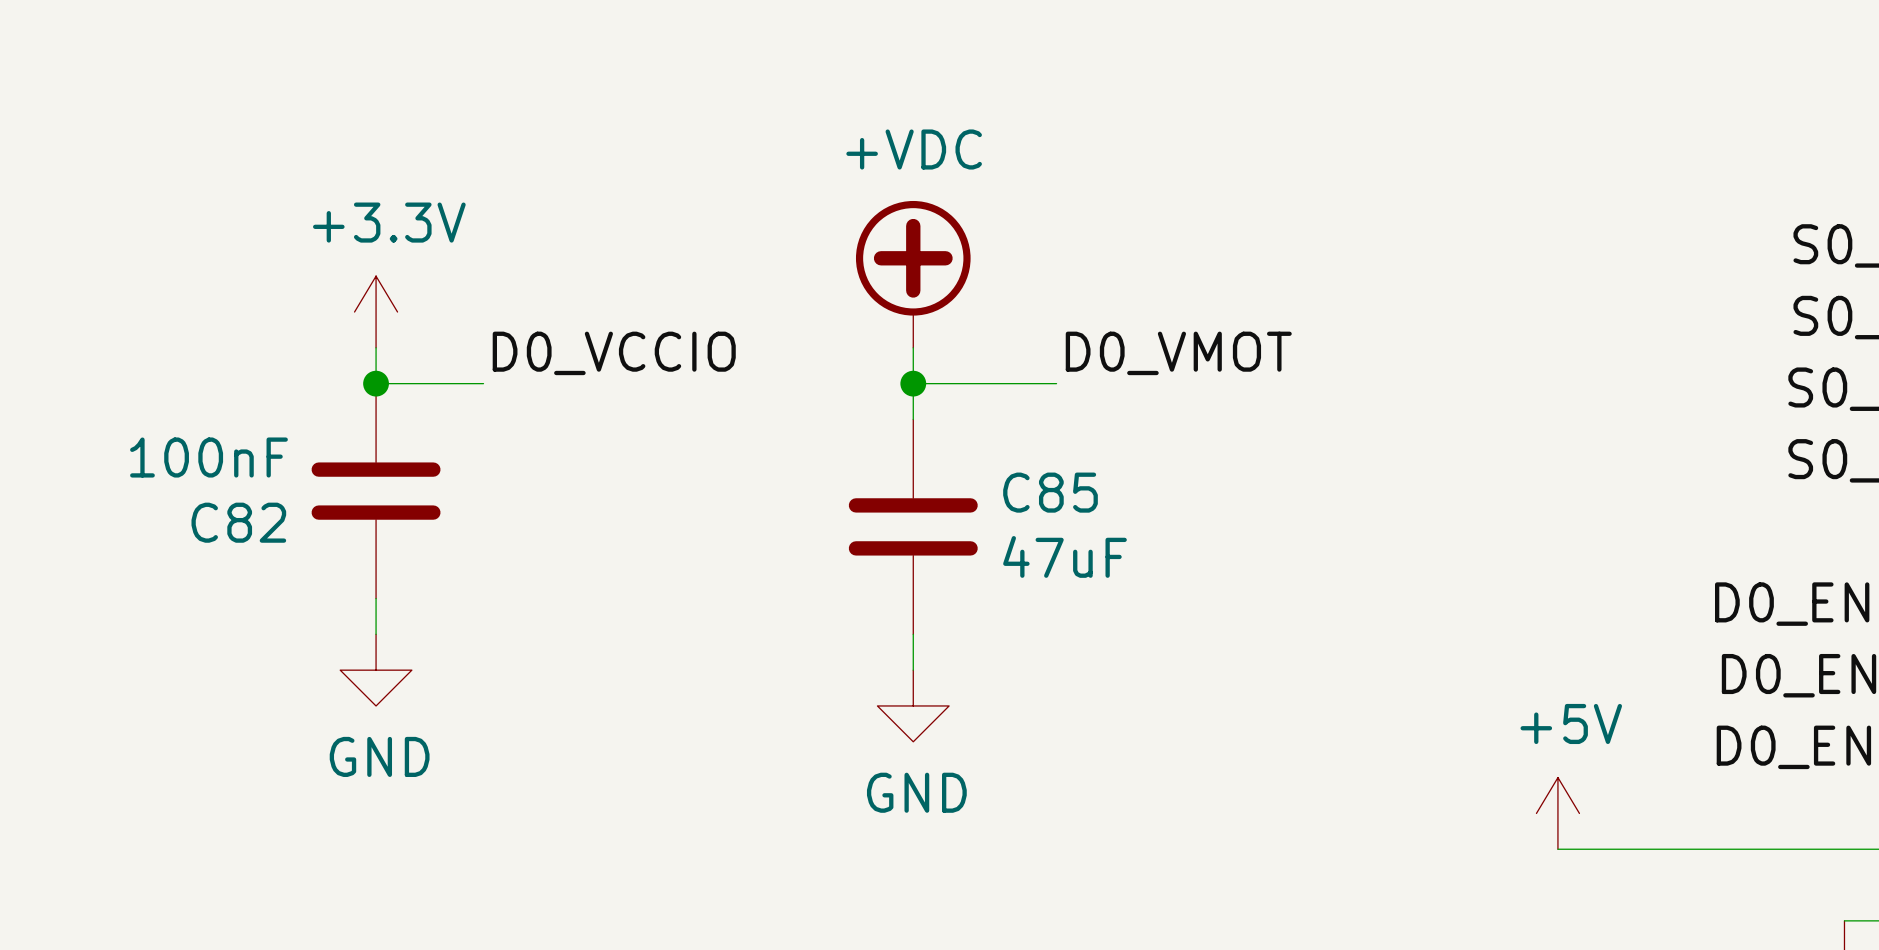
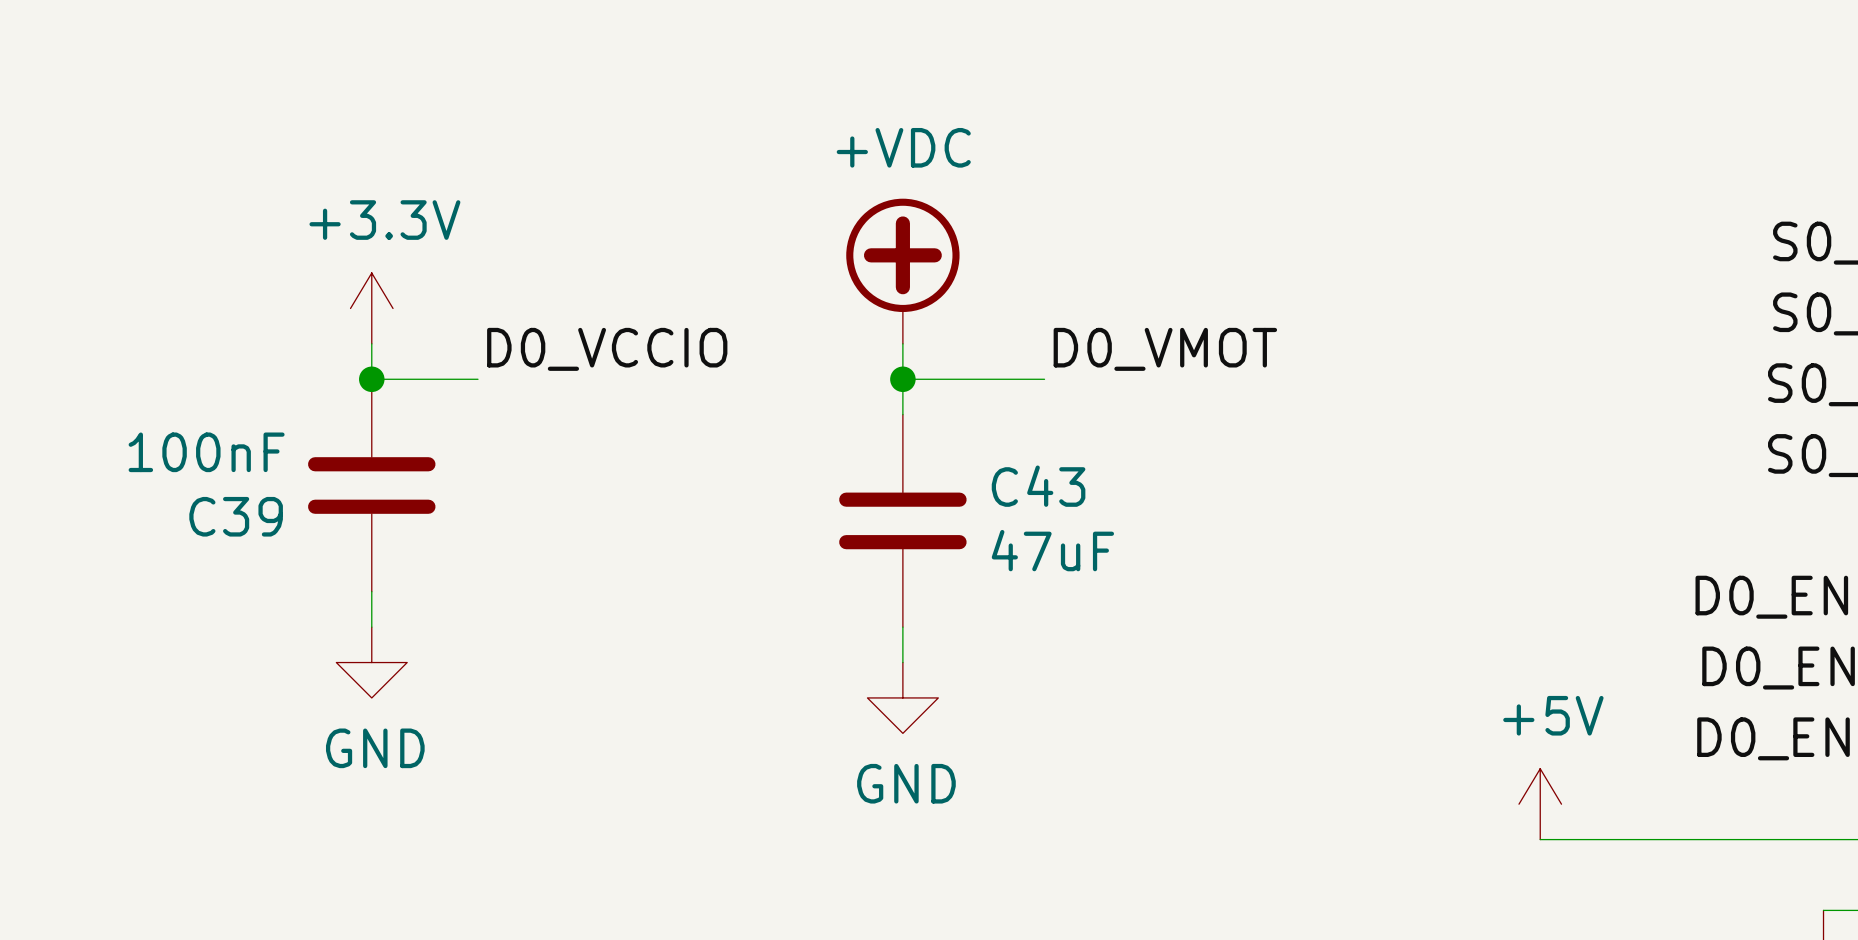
C85 name: C85 (1050, 492) -> C43 (1038, 486)
C82 name: C82 (238, 522) -> C39 (236, 516)

